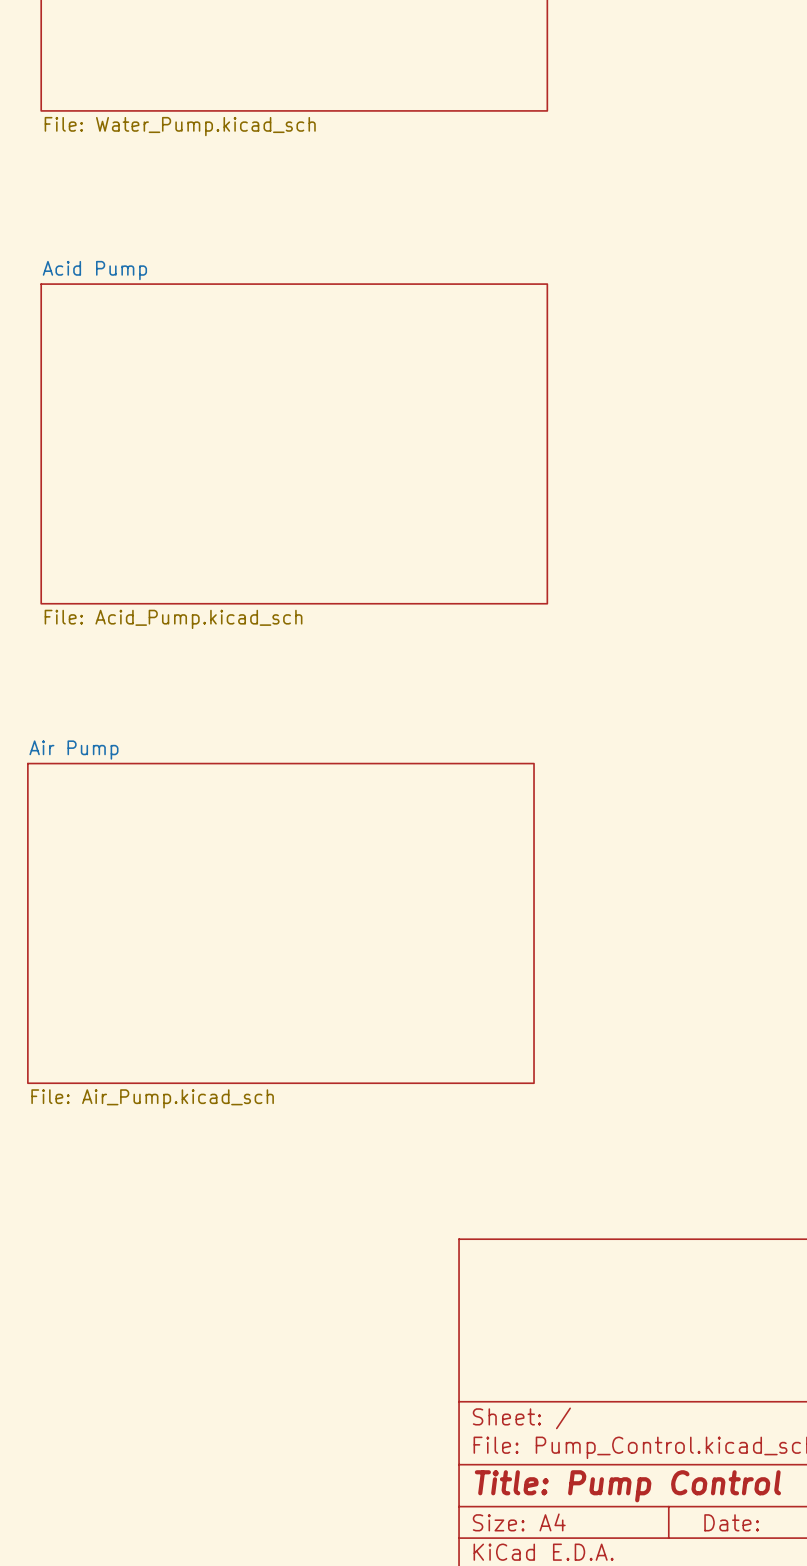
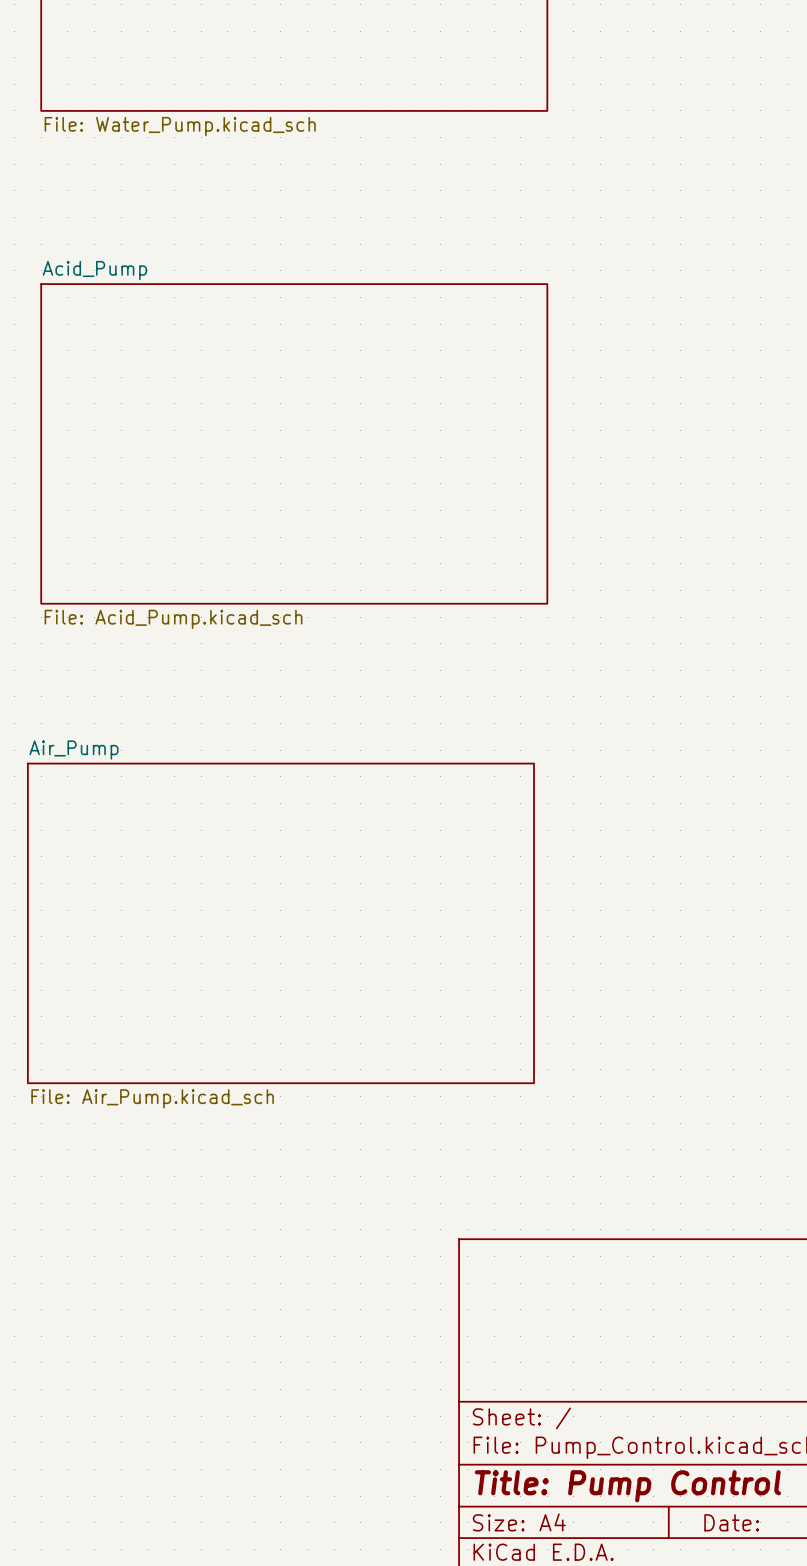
sheet Acid Pump name: Acid Pump (94, 270) -> Acid_Pump (94, 270)
sheet Air Pump name: Air Pump (73, 750) -> Air_Pump (73, 750)

